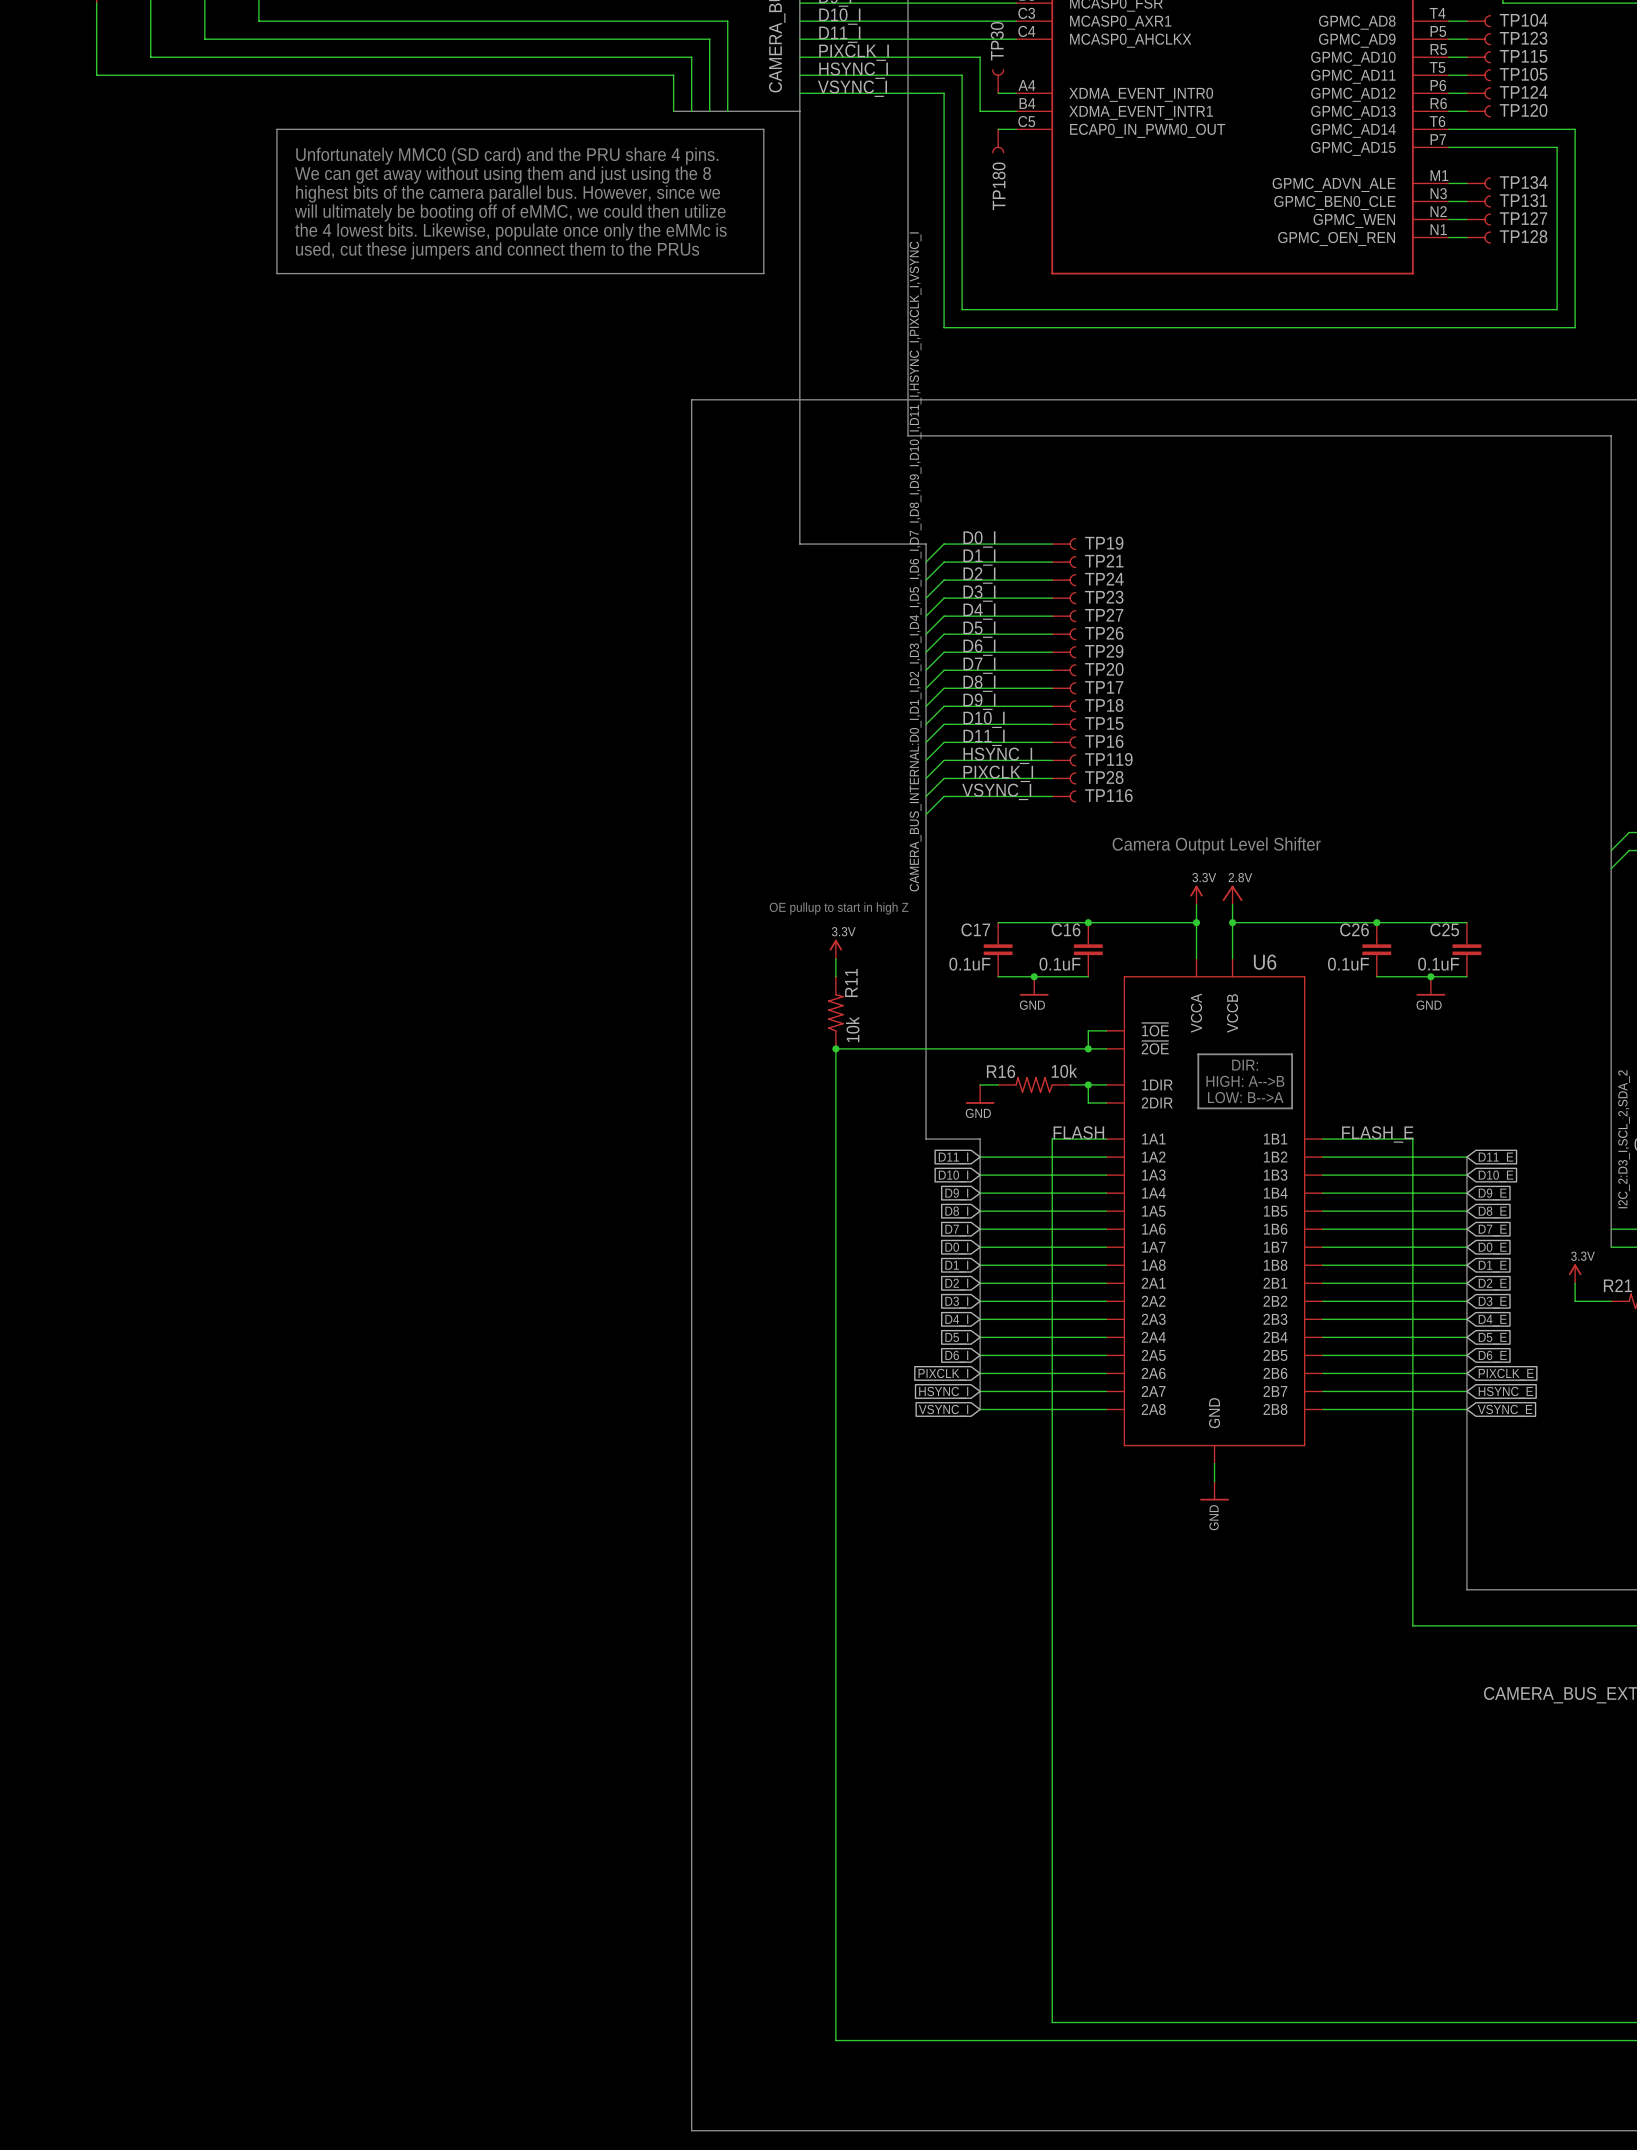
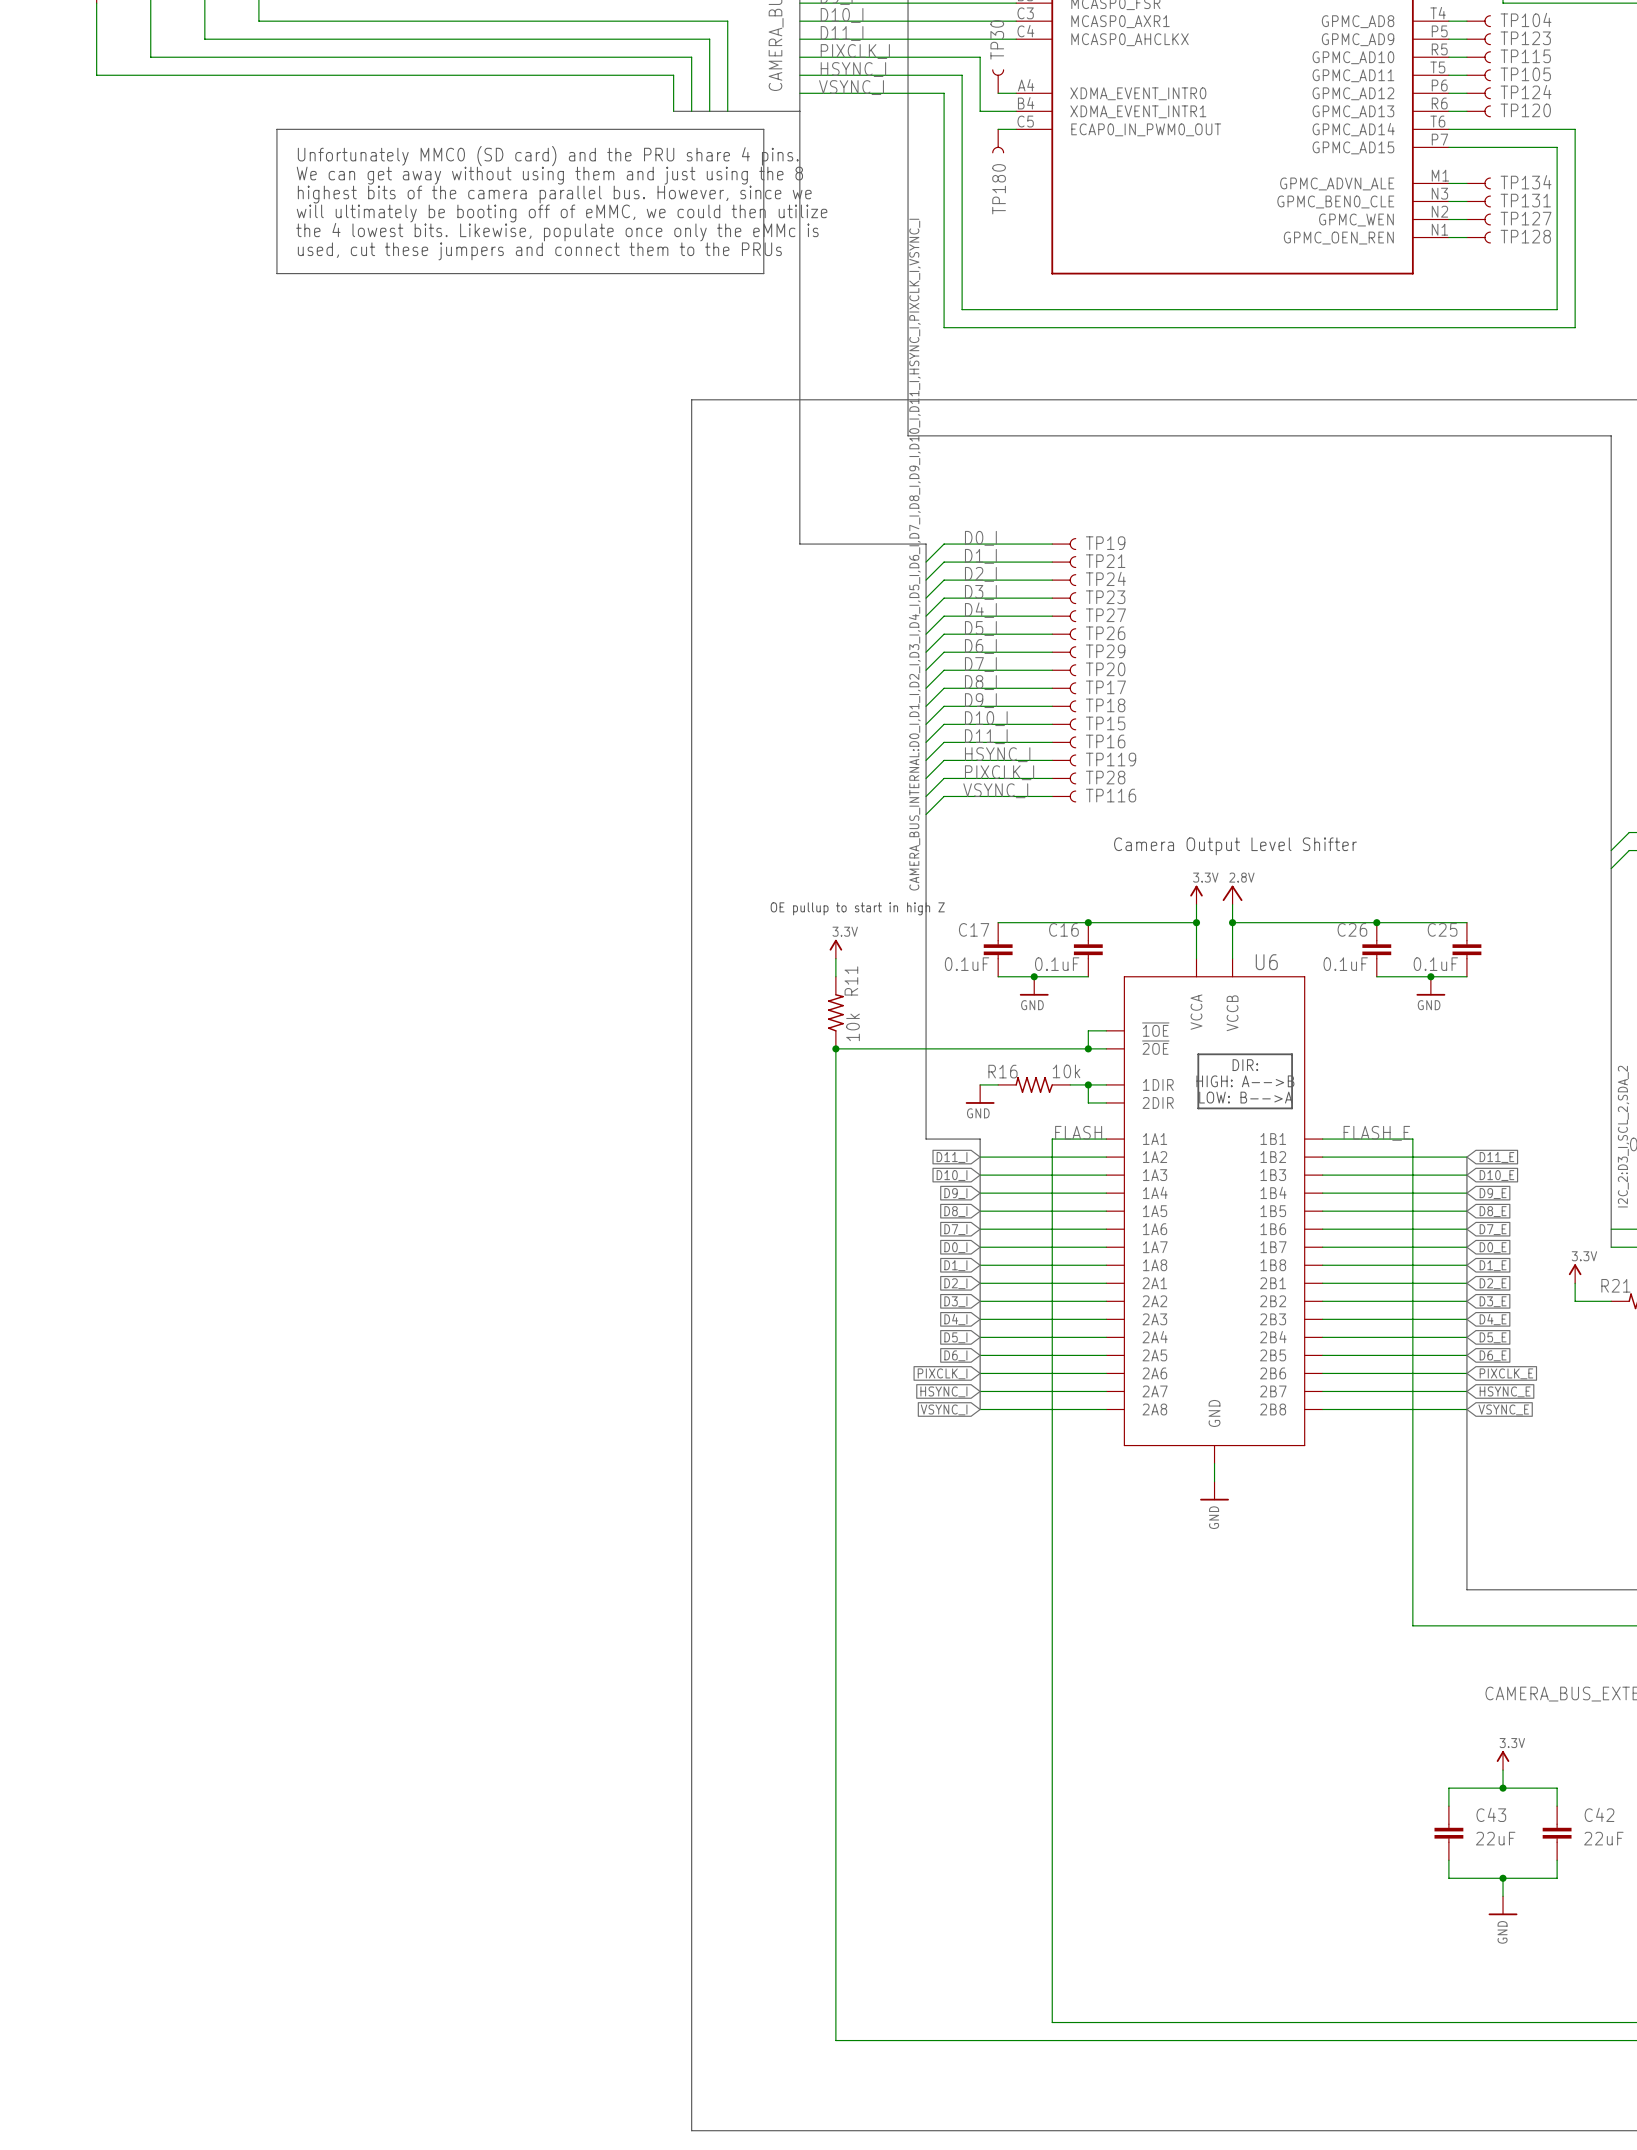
power symbol: none -> 3.3V (1503, 1760)
wire: none -> (1503, 1770) (1503, 1788)
junction: none -> (1503, 1788)
wire: none -> (1448, 1806) (1448, 1788) (1557, 1788) (1557, 1806)
C43: none -> 22uF (1448, 1833)
C42: none -> 22uF (1557, 1833)
wire: none -> (1448, 1860) (1448, 1878) (1557, 1878) (1557, 1860)
wire: none -> (1503, 1878) (1503, 1896)
junction: none -> (1503, 1878)
power symbol: none -> GND (1503, 1905)

